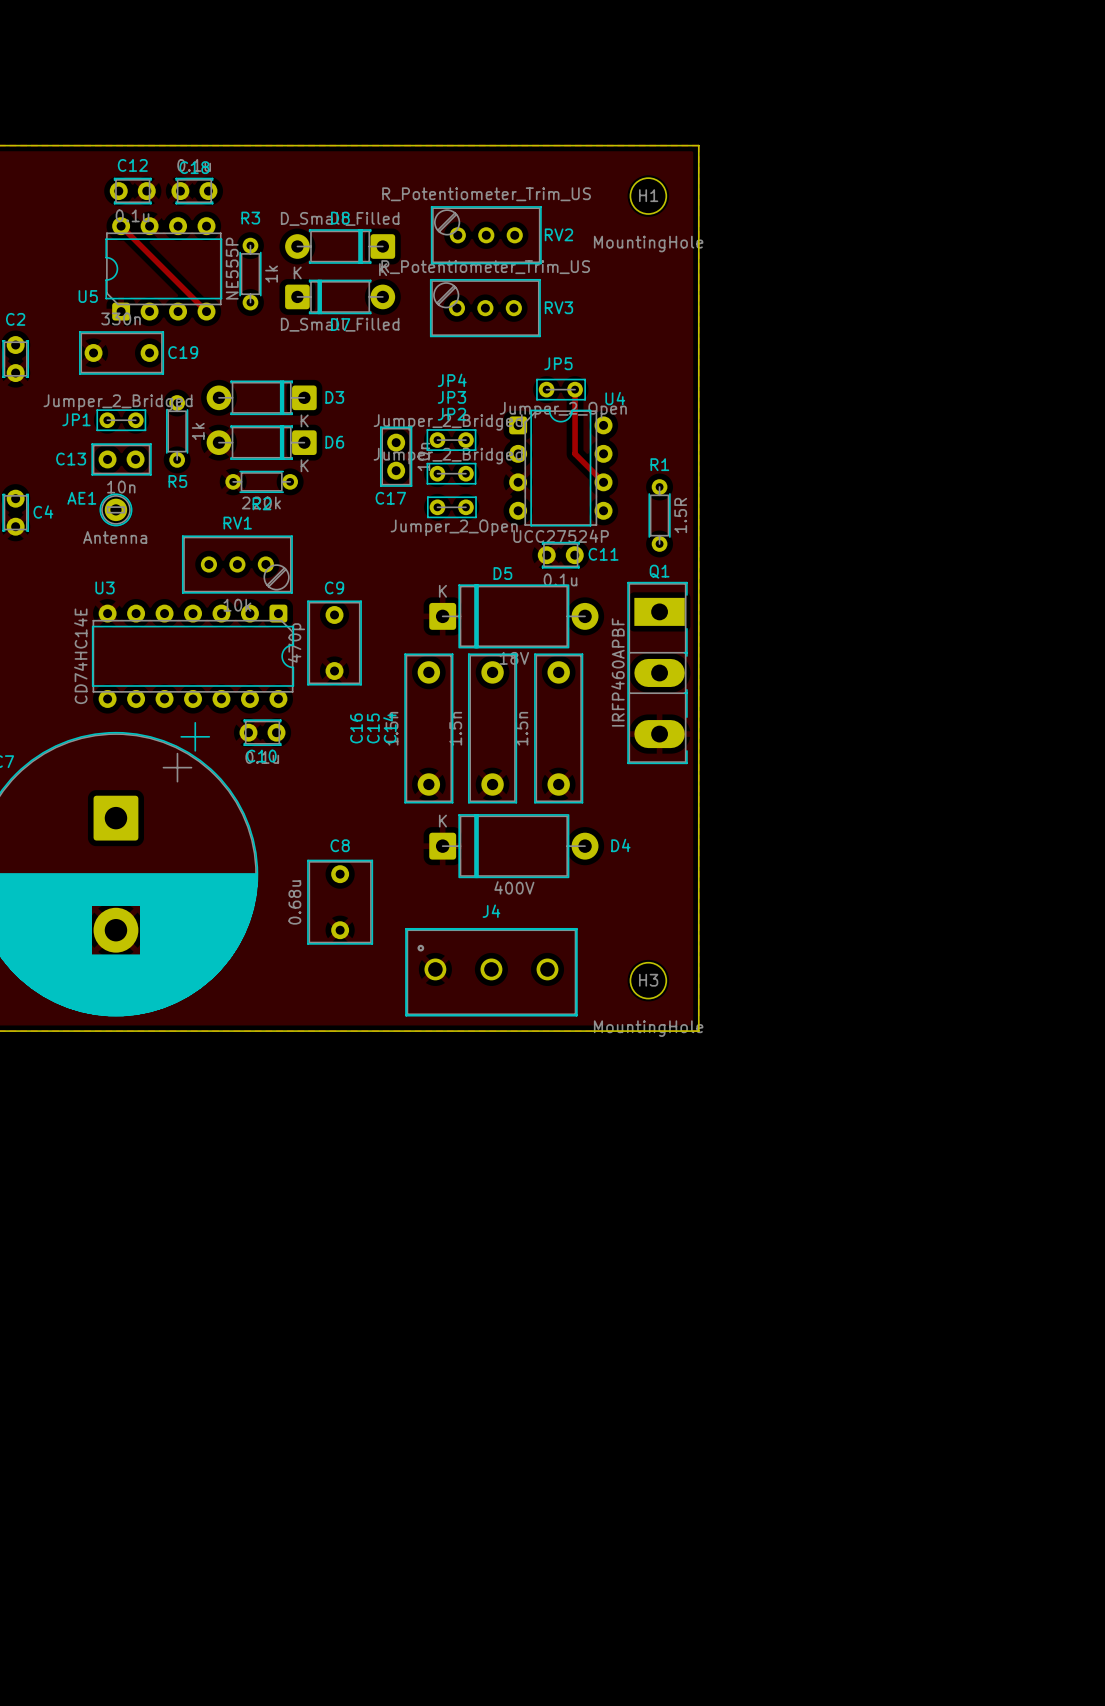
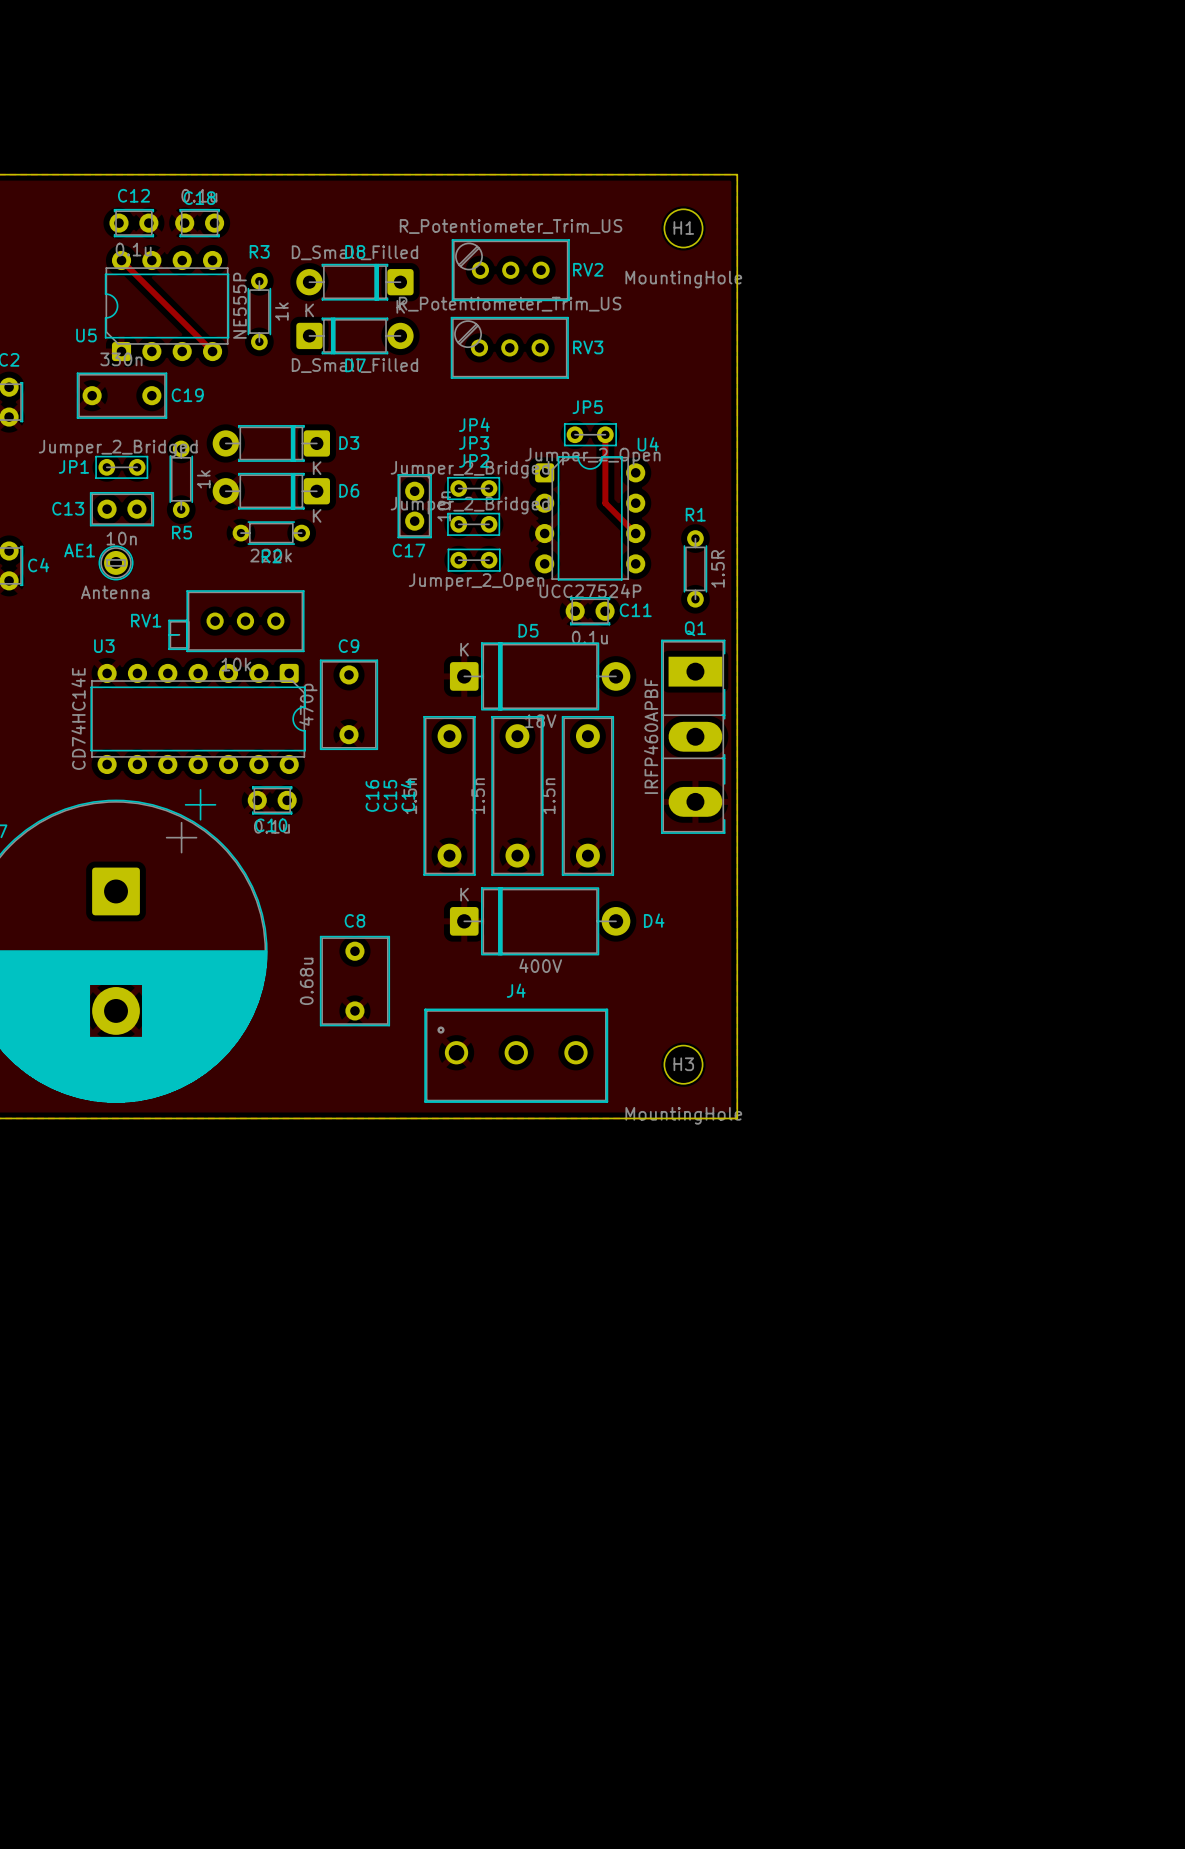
RV1 name position: RV1 (237, 523) -> RV1 (146, 620)
RV1 footprint: [182, 535, 293, 594] -> [168, 590, 305, 653]

